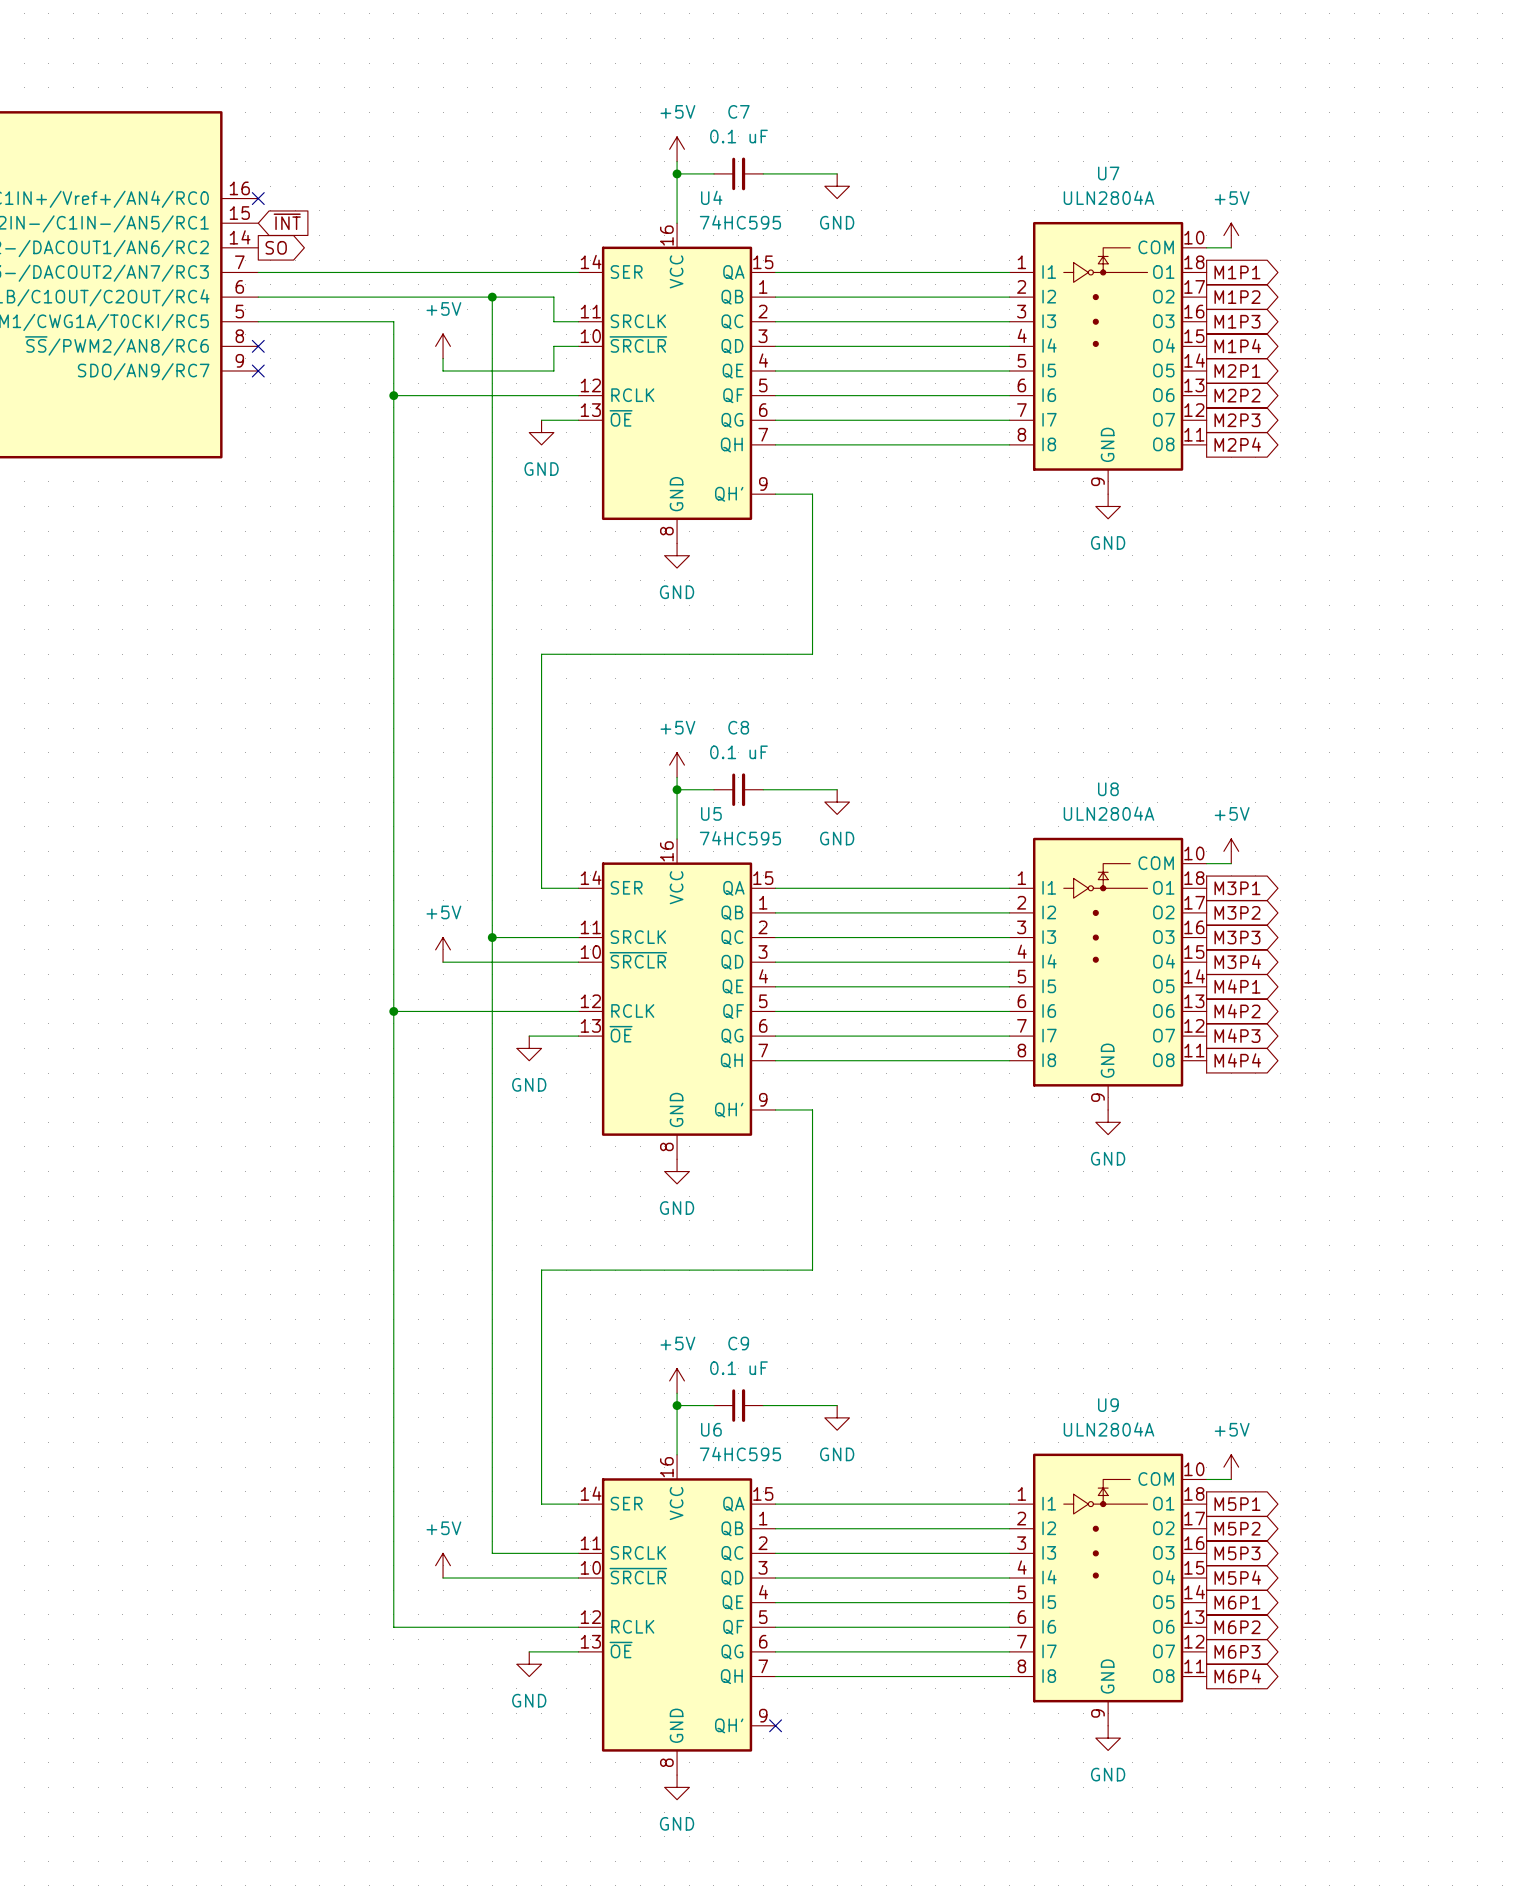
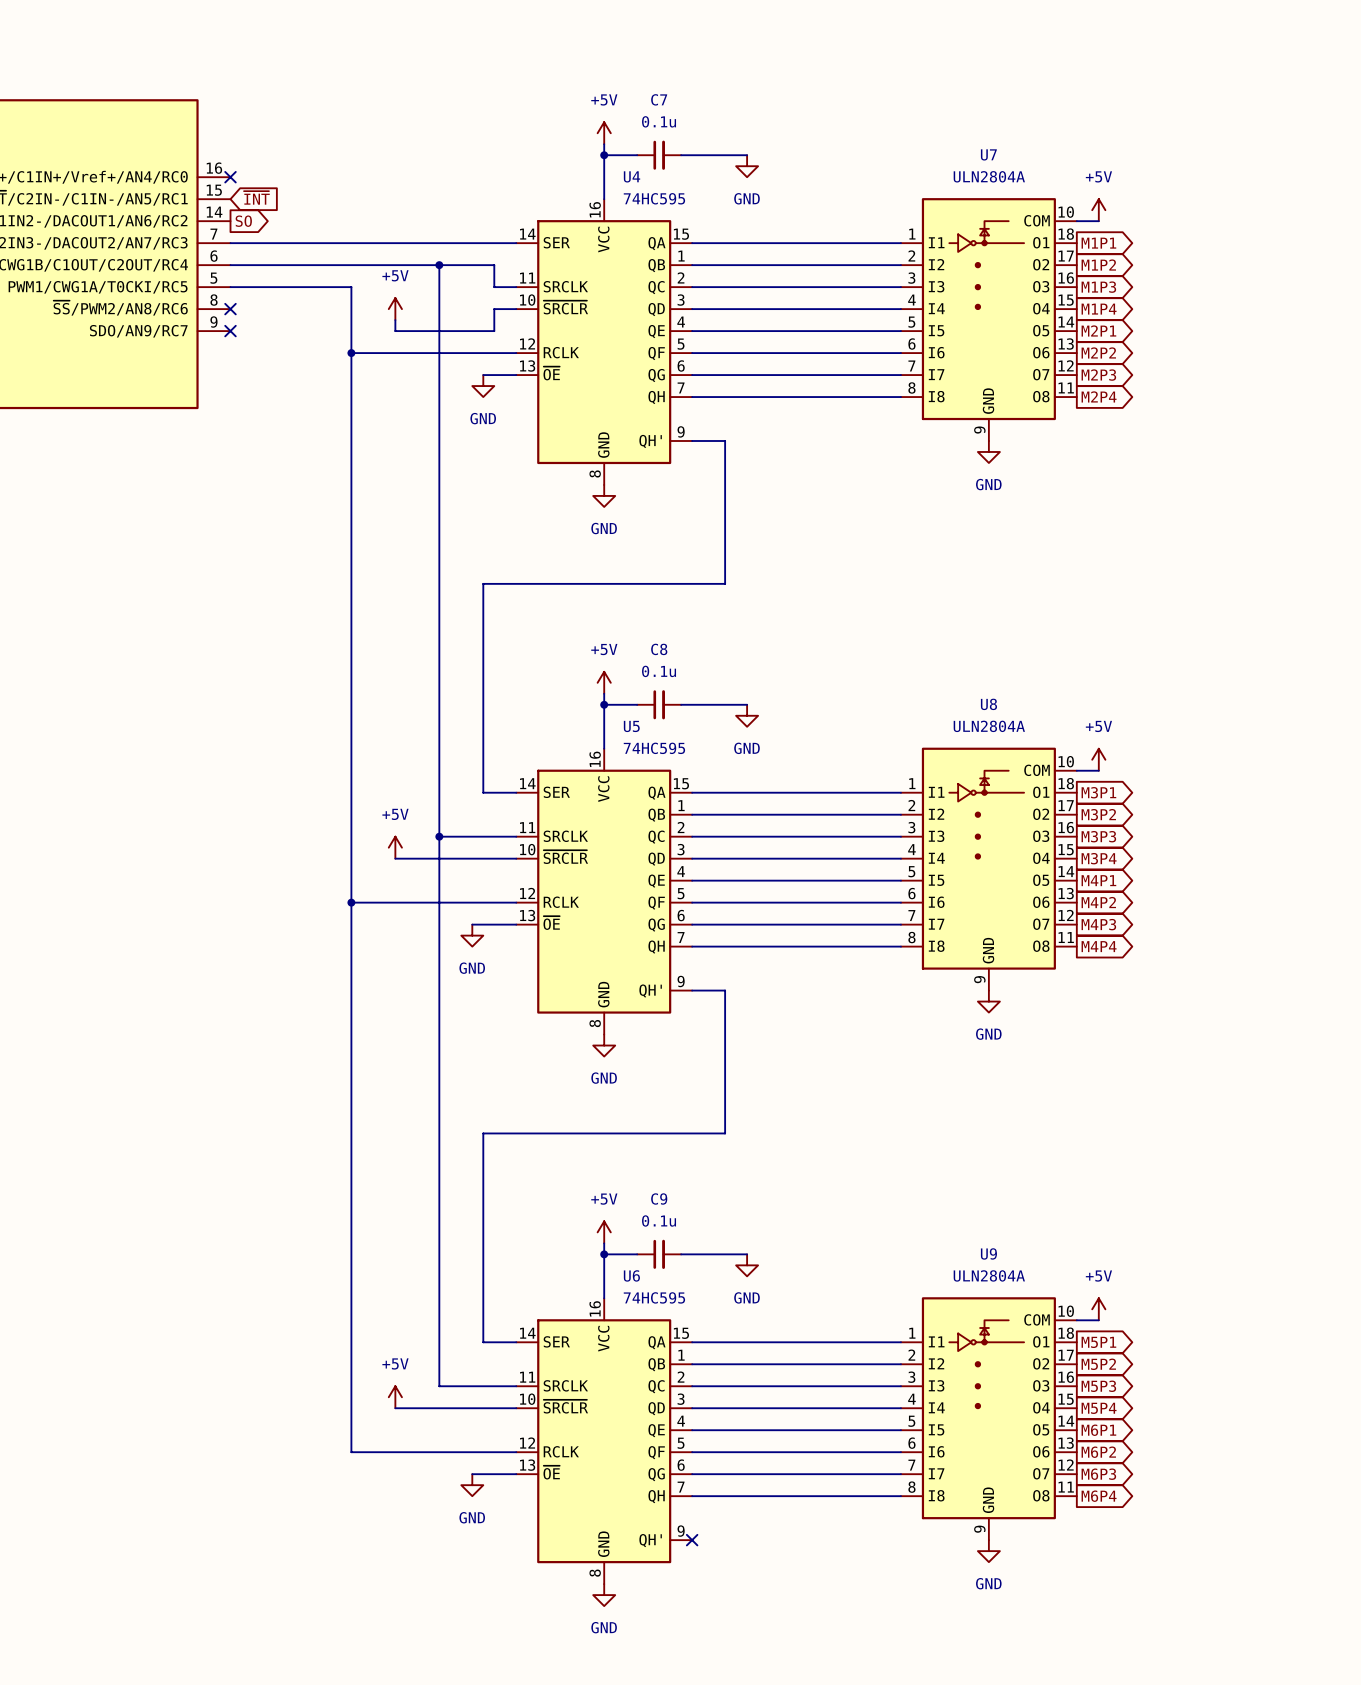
C7 value: 0.1 uF (738, 136) -> 0.1u (659, 121)
C8 value: 0.1 uF (738, 752) -> 0.1u (659, 671)
C9 value: 0.1 uF (738, 1368) -> 0.1u (659, 1220)

